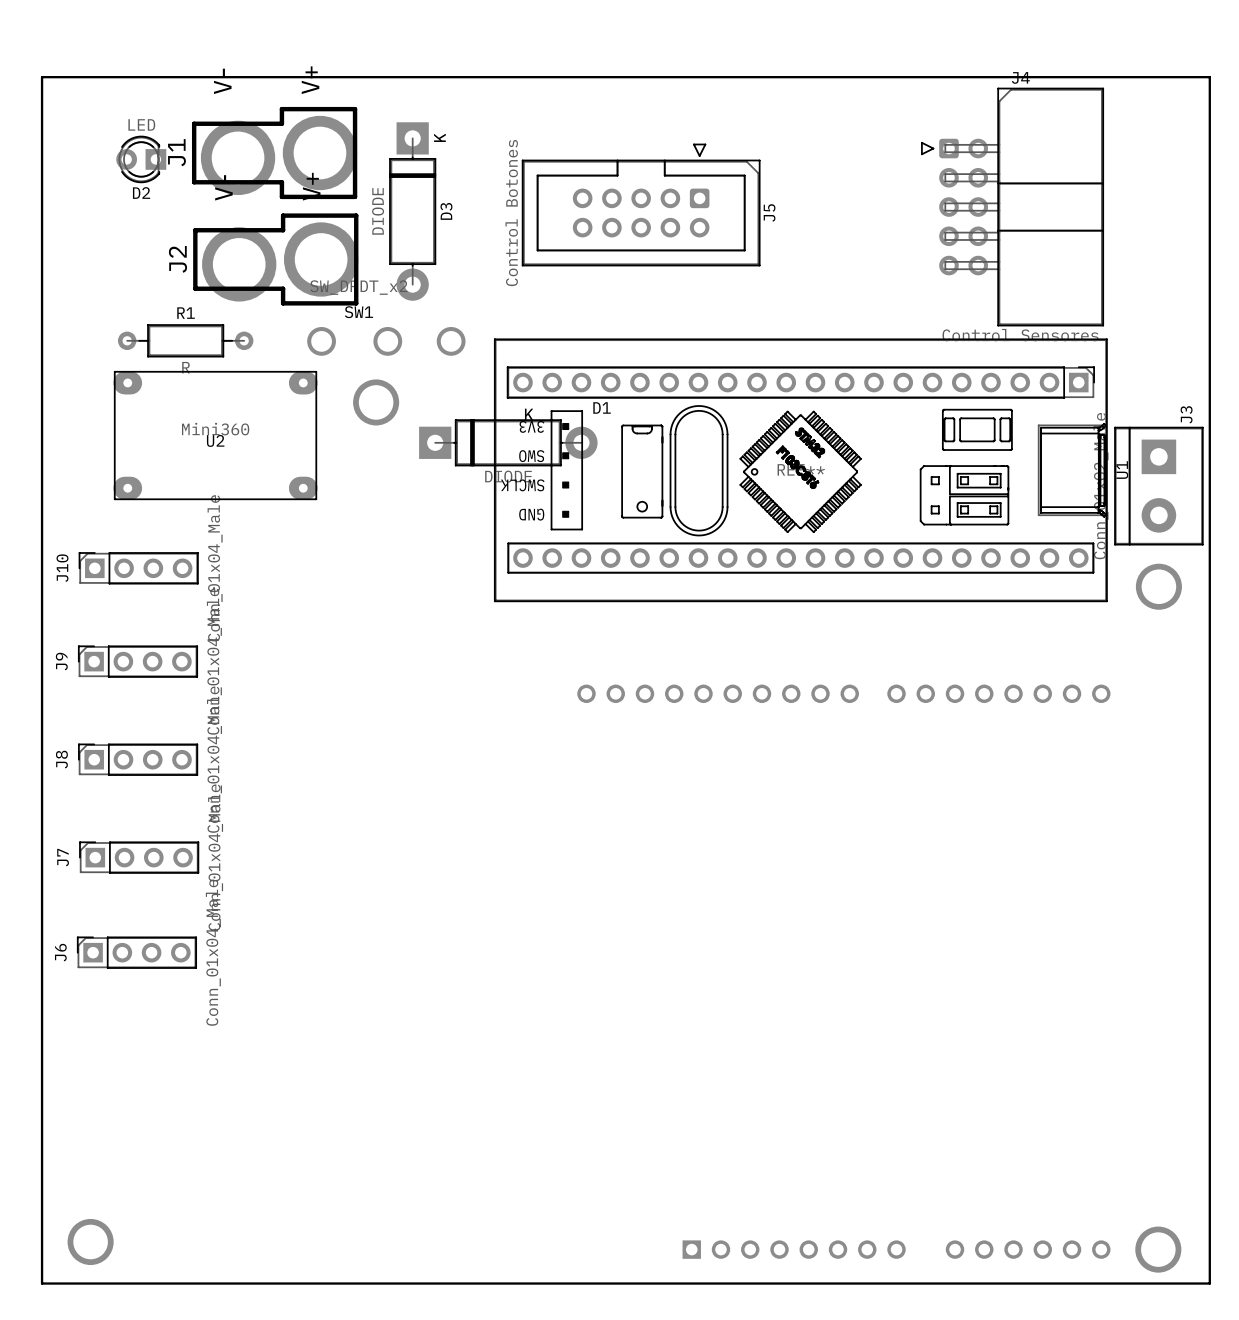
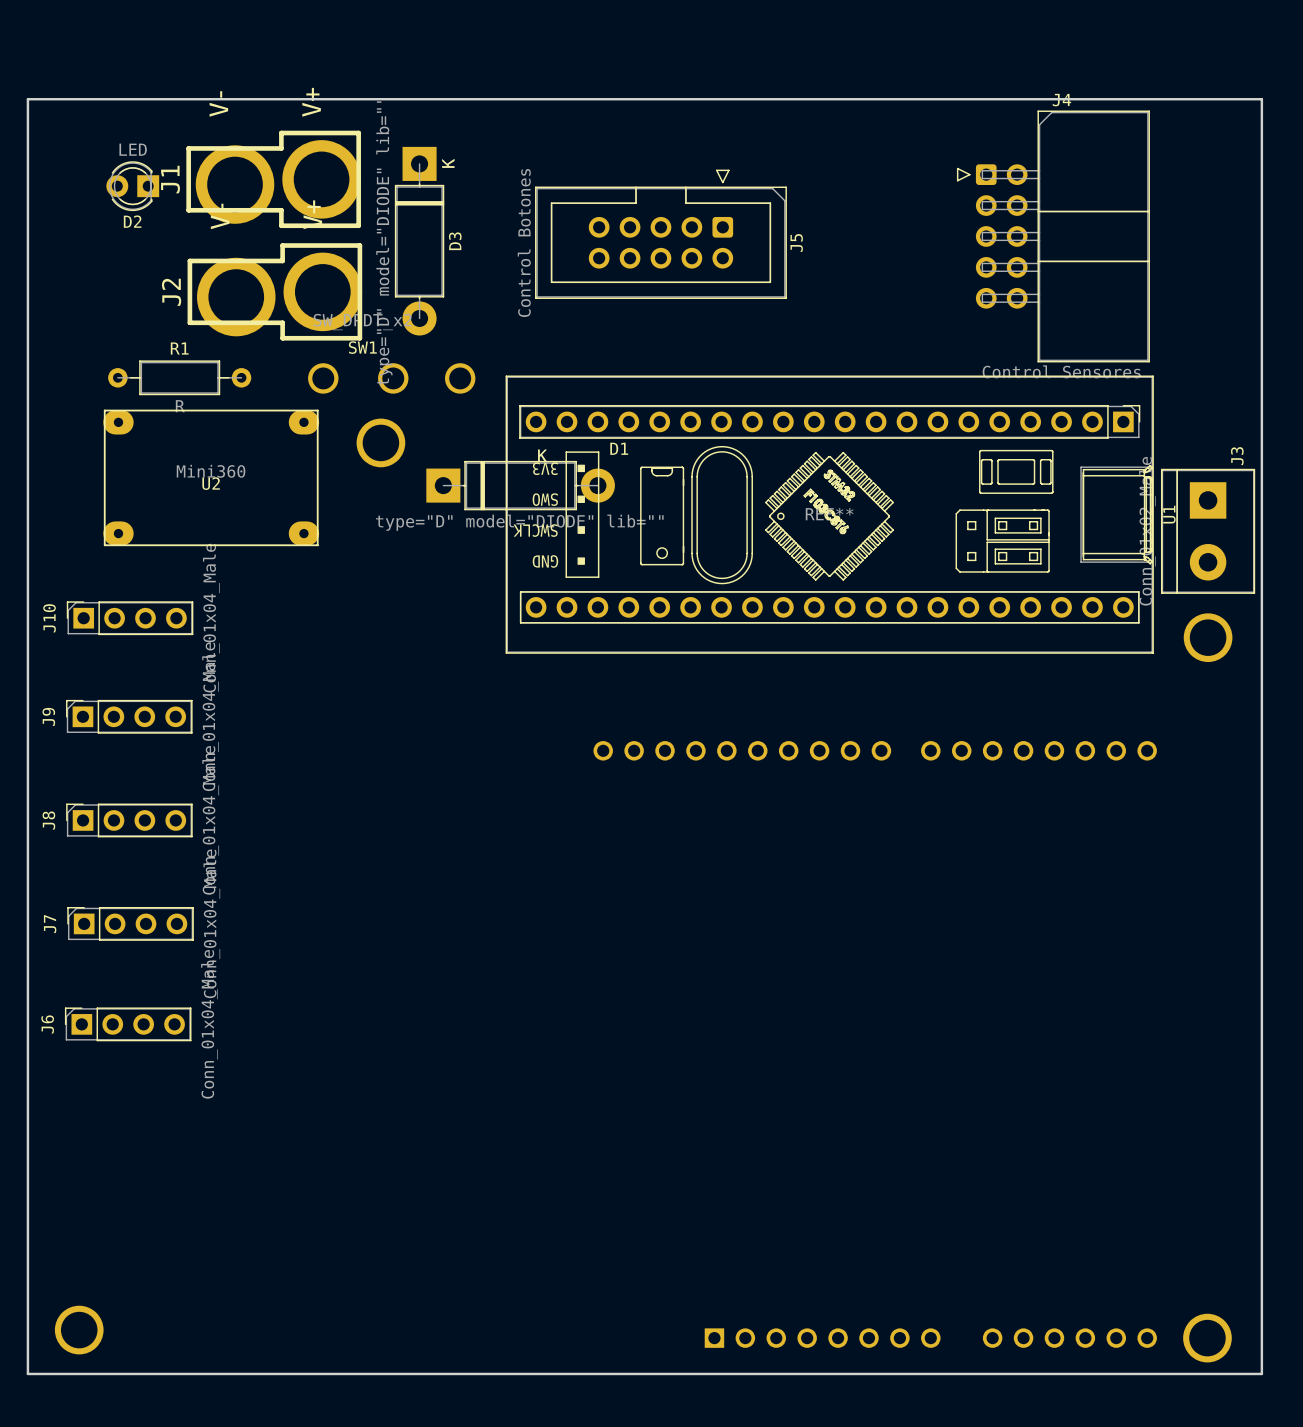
D3 value: DIODE (378, 211) -> type="D" model="DIODE" lib="" (384, 242)
D1 value: DIODE (508, 476) -> type="D" model="DIODE" lib="" (519, 522)

